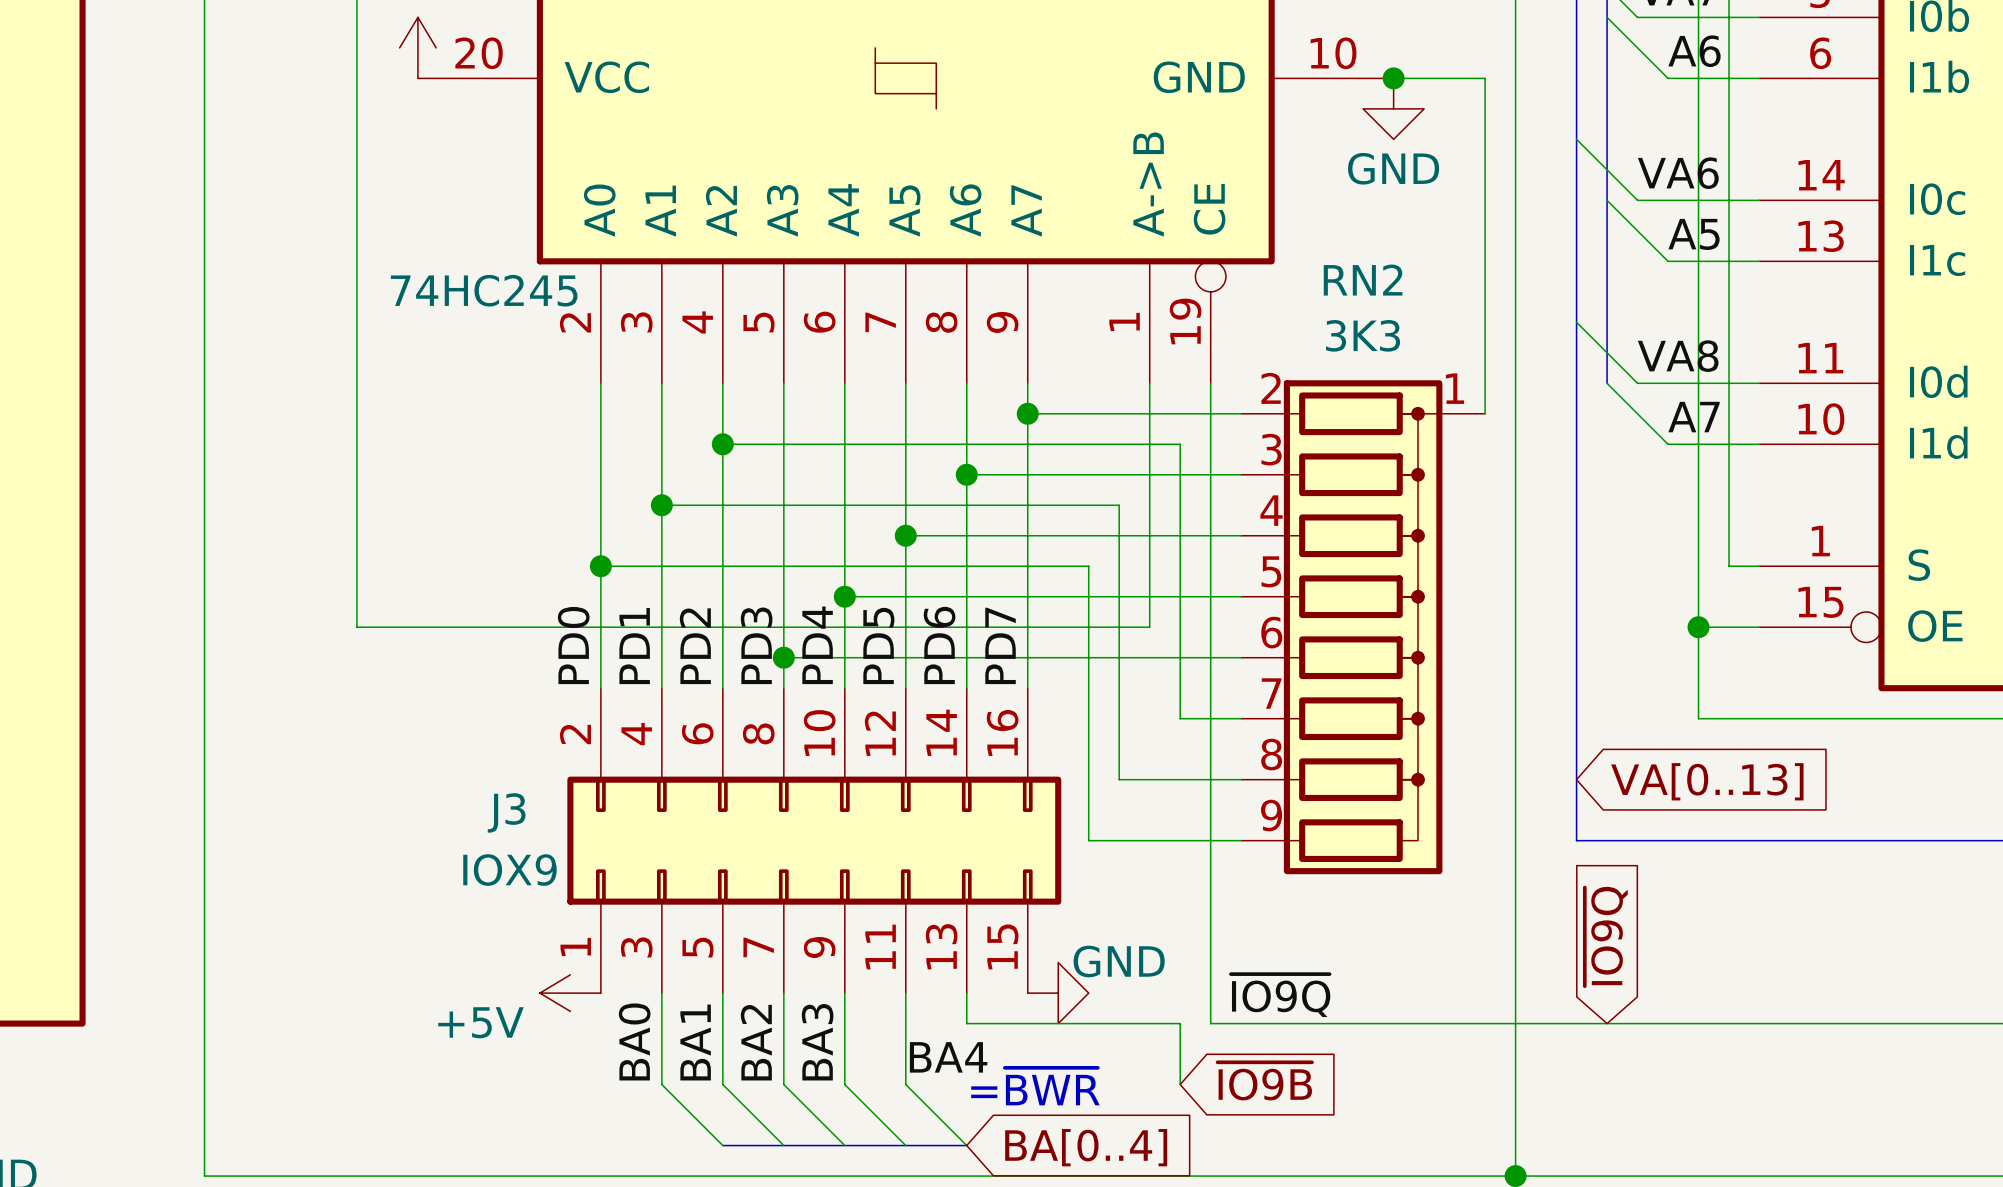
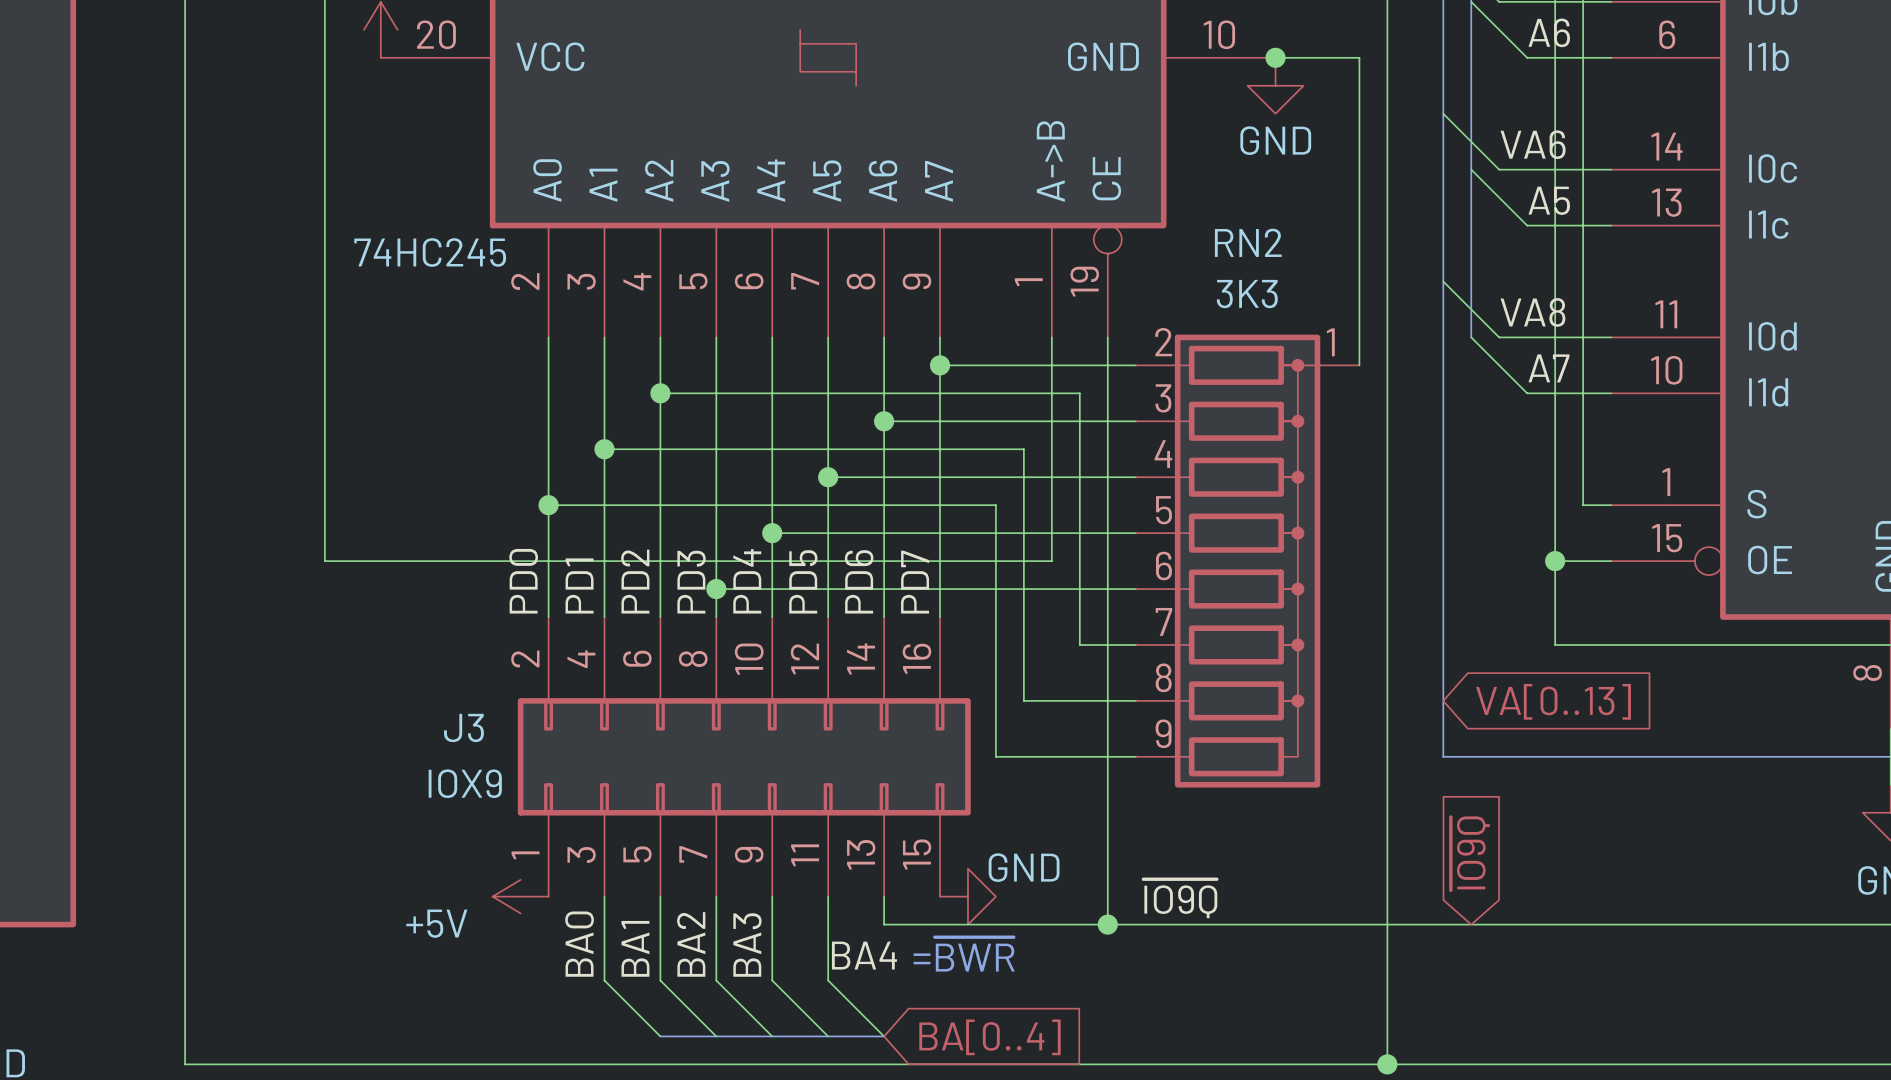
wire: (1180, 1023) (1180, 1084) -> (1079, 924) (1107, 924)
junction: none -> (1107, 924)
global label: ~{IO9B} (1264, 1081) -> none
text position: =~{BWR} (1035, 1086) -> =~{BWR} (964, 954)

